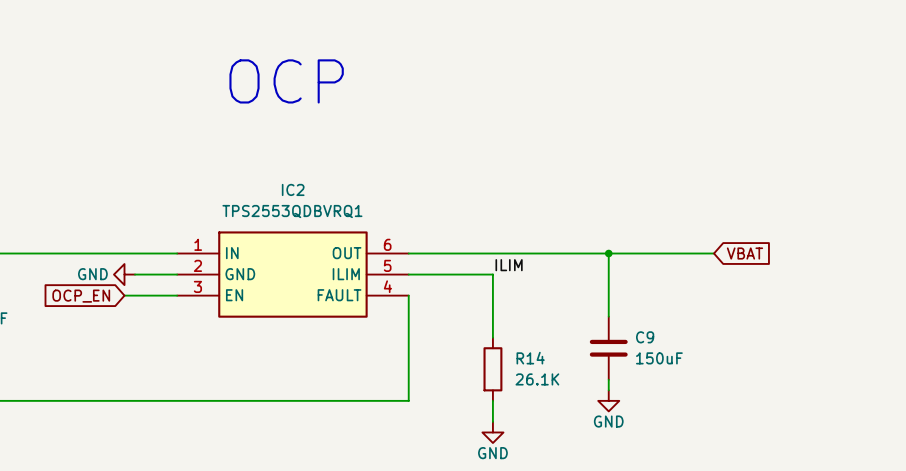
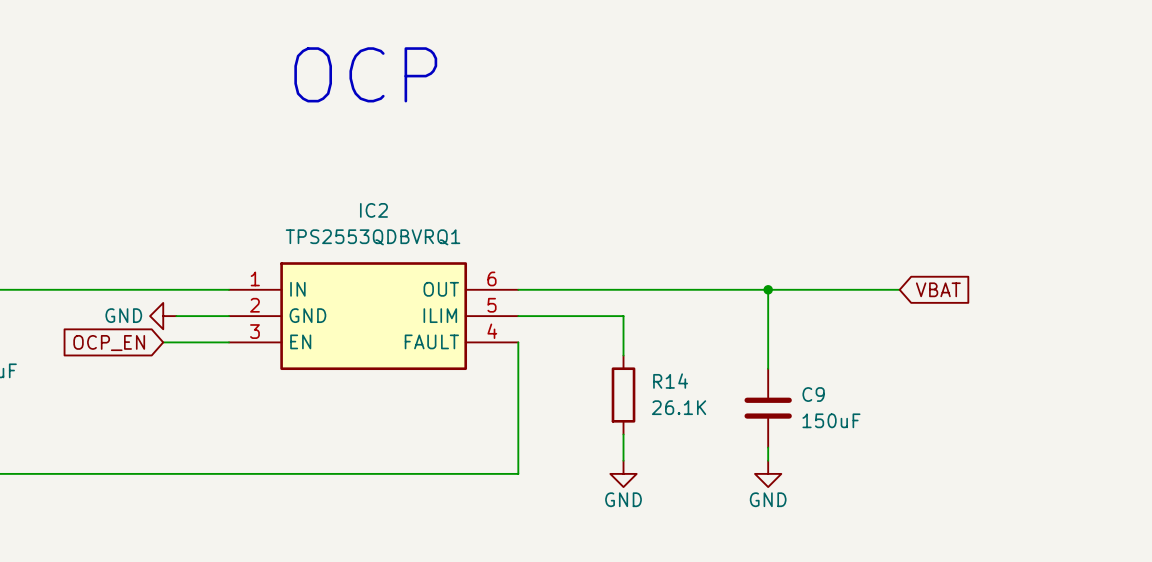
label: ILIM (509, 265) -> none
wire: (492, 306) (492, 337) -> none
R14 position: (492, 369) -> (623, 395)
wire: (492, 400) (492, 421) -> (623, 434) (623, 460)
power symbol position: GND (492, 432) -> GND (623, 473)

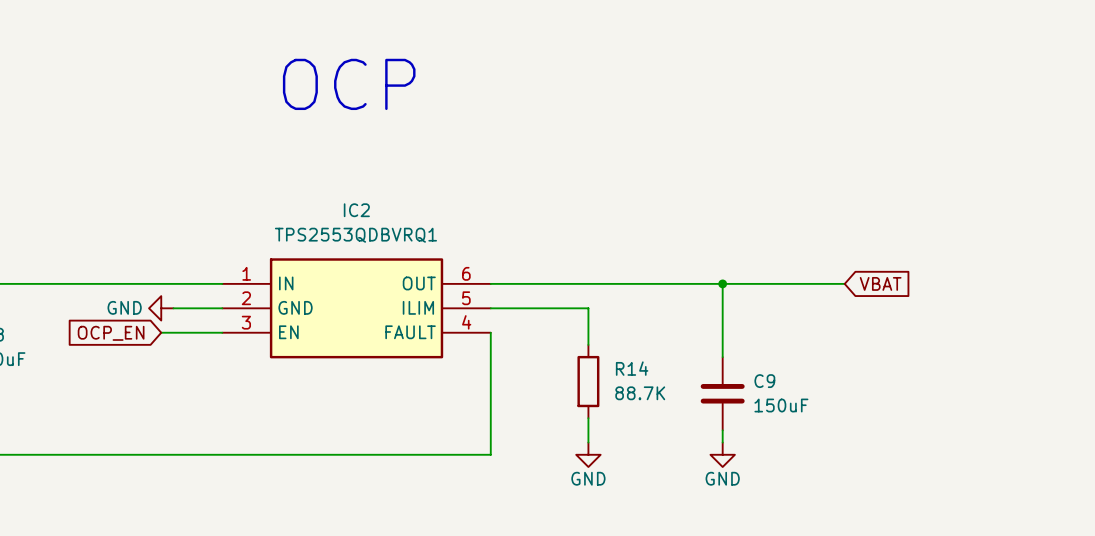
R14 value: 26.1K (679, 407) -> 88.7K (640, 393)

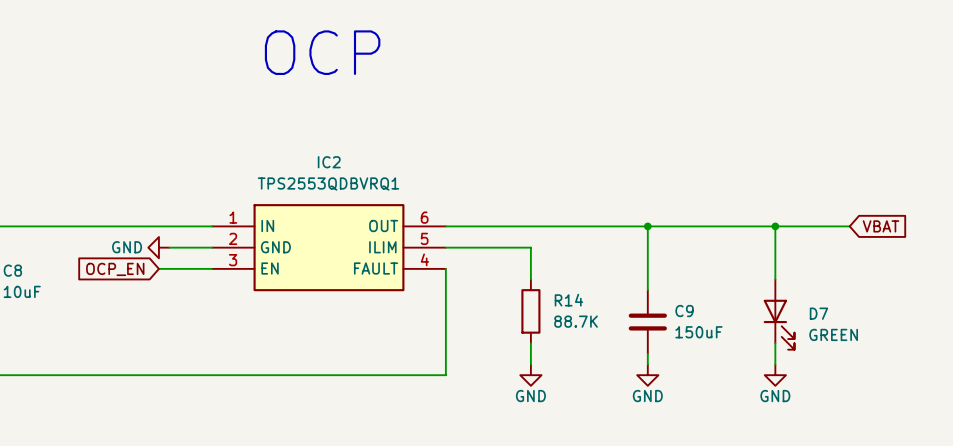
wire: none -> (754, 226) (849, 226)
wire: none -> (775, 226) (775, 279)
junction: none -> (775, 226)
global label position: VBAT (880, 283) -> VBAT (881, 226)
D7: none -> GREEN (779, 314)
wire: none -> (775, 343) (775, 364)
power symbol: none -> GND (775, 375)

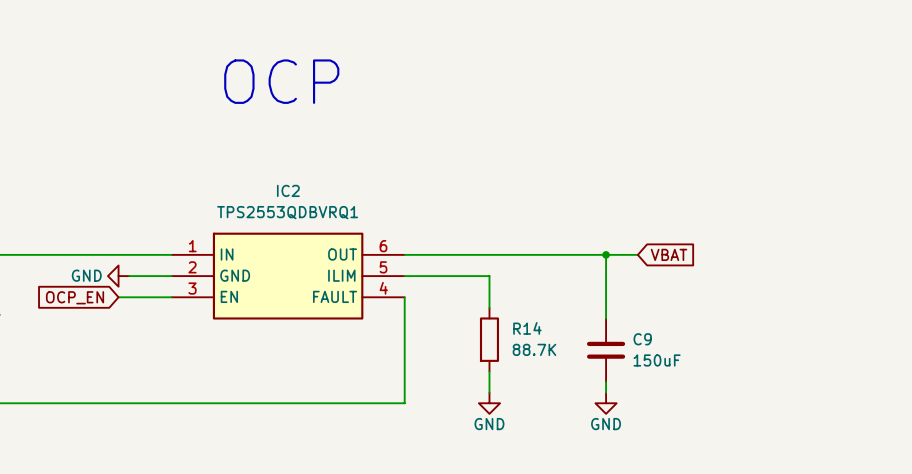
wire: (679, 226) (849, 226) -> none
wire: (775, 226) (775, 279) -> none
junction: (775, 226) -> none
global label position: VBAT (881, 226) -> VBAT (669, 254)
D7: GREEN (779, 314) -> none
wire: (775, 343) (775, 364) -> none
power symbol: GND (775, 375) -> none

